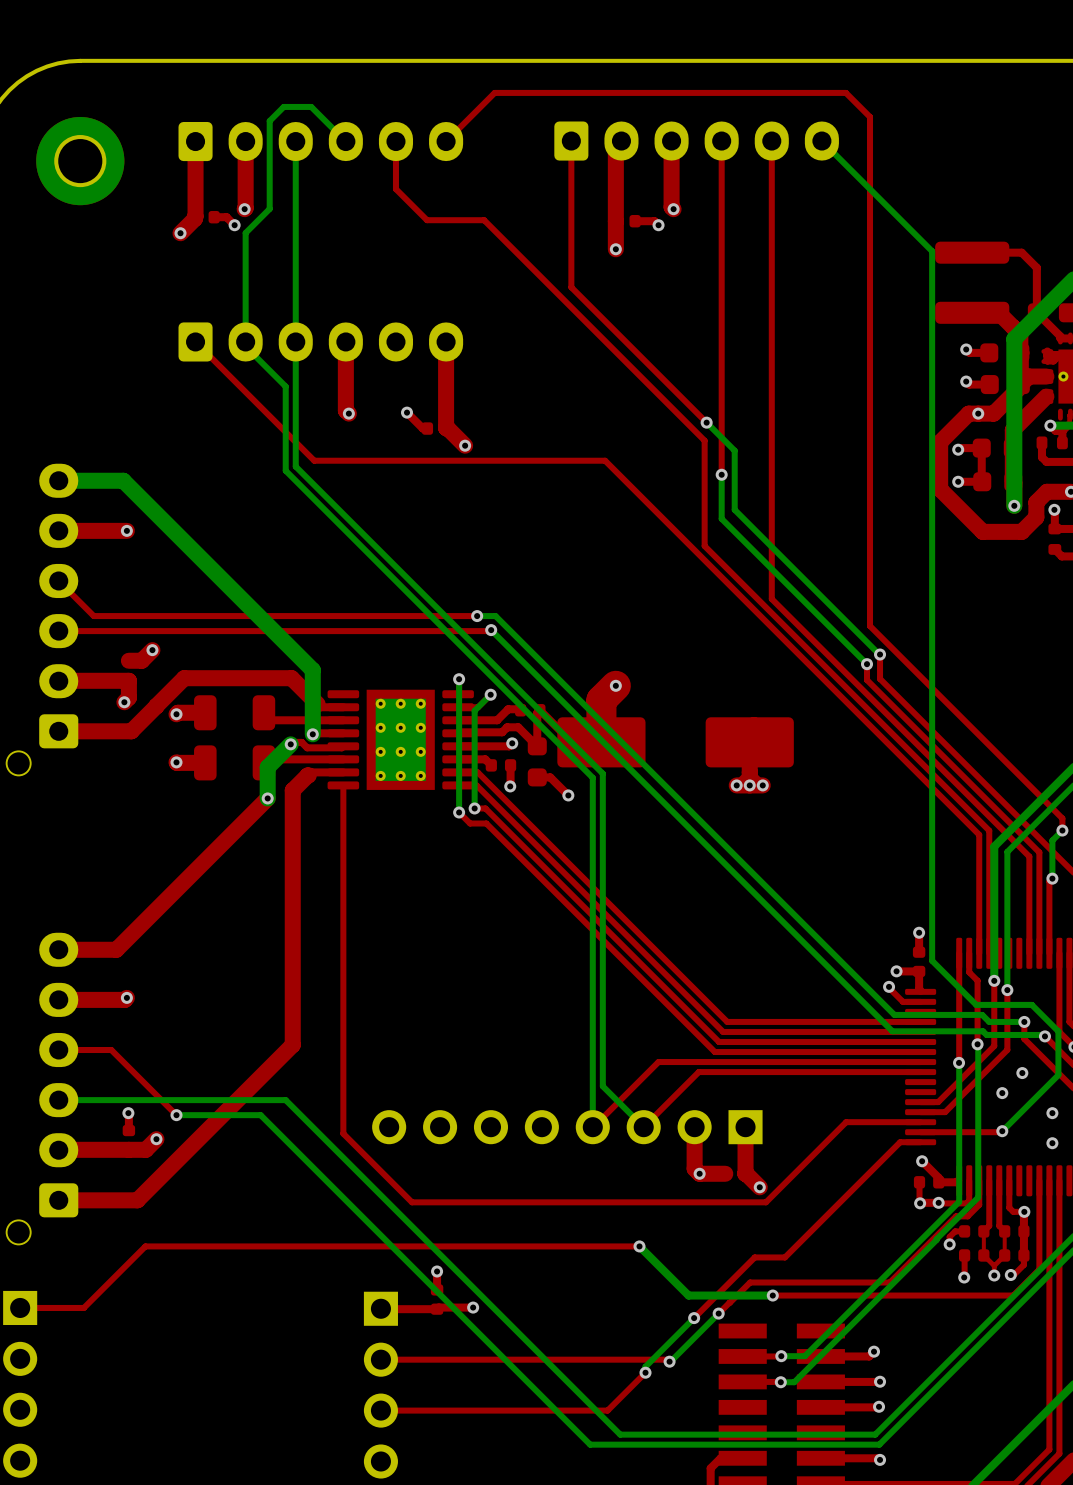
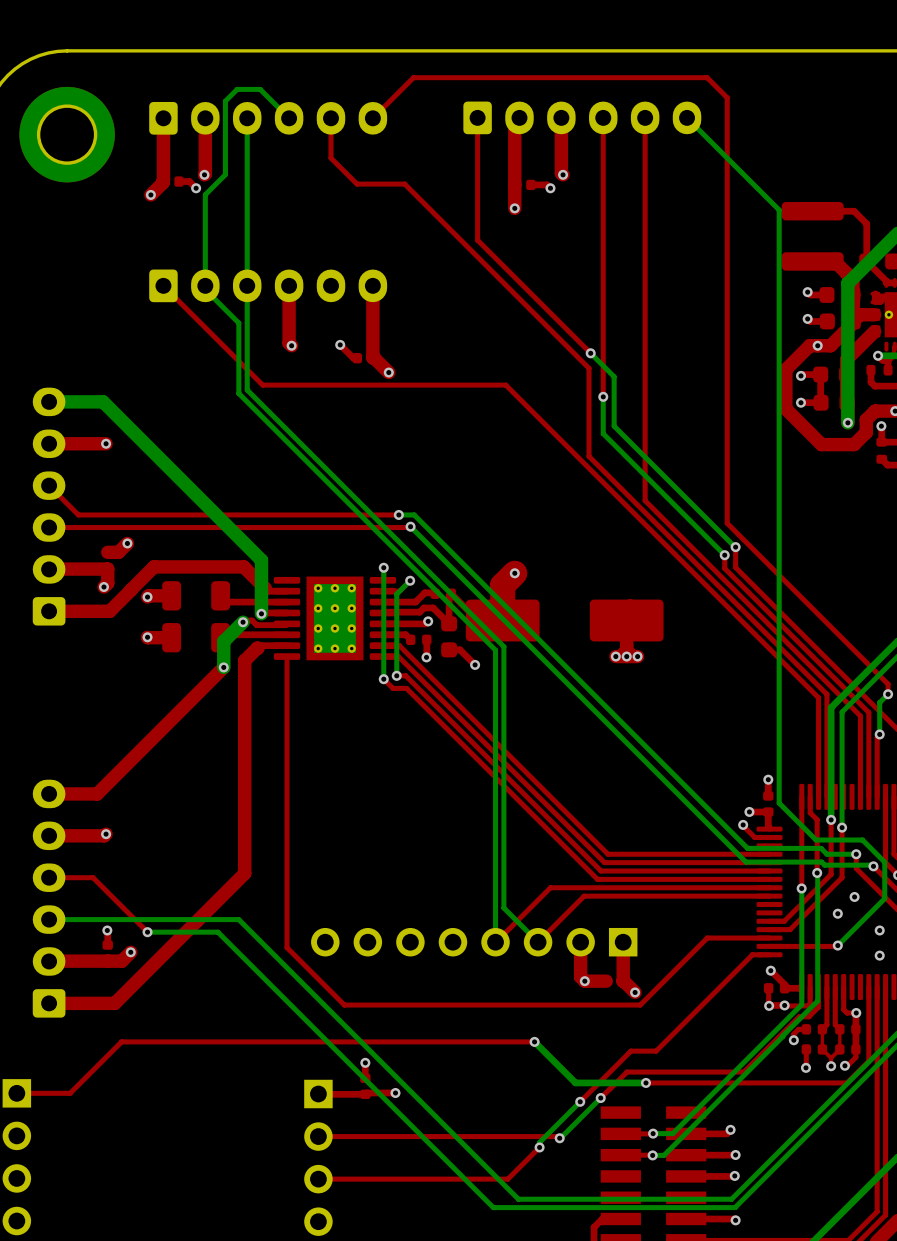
part footprint: [36, 116, 125, 206] -> [19, 86, 115, 183]
part: (42, 619) -> none
part: (42, 1088) -> none

